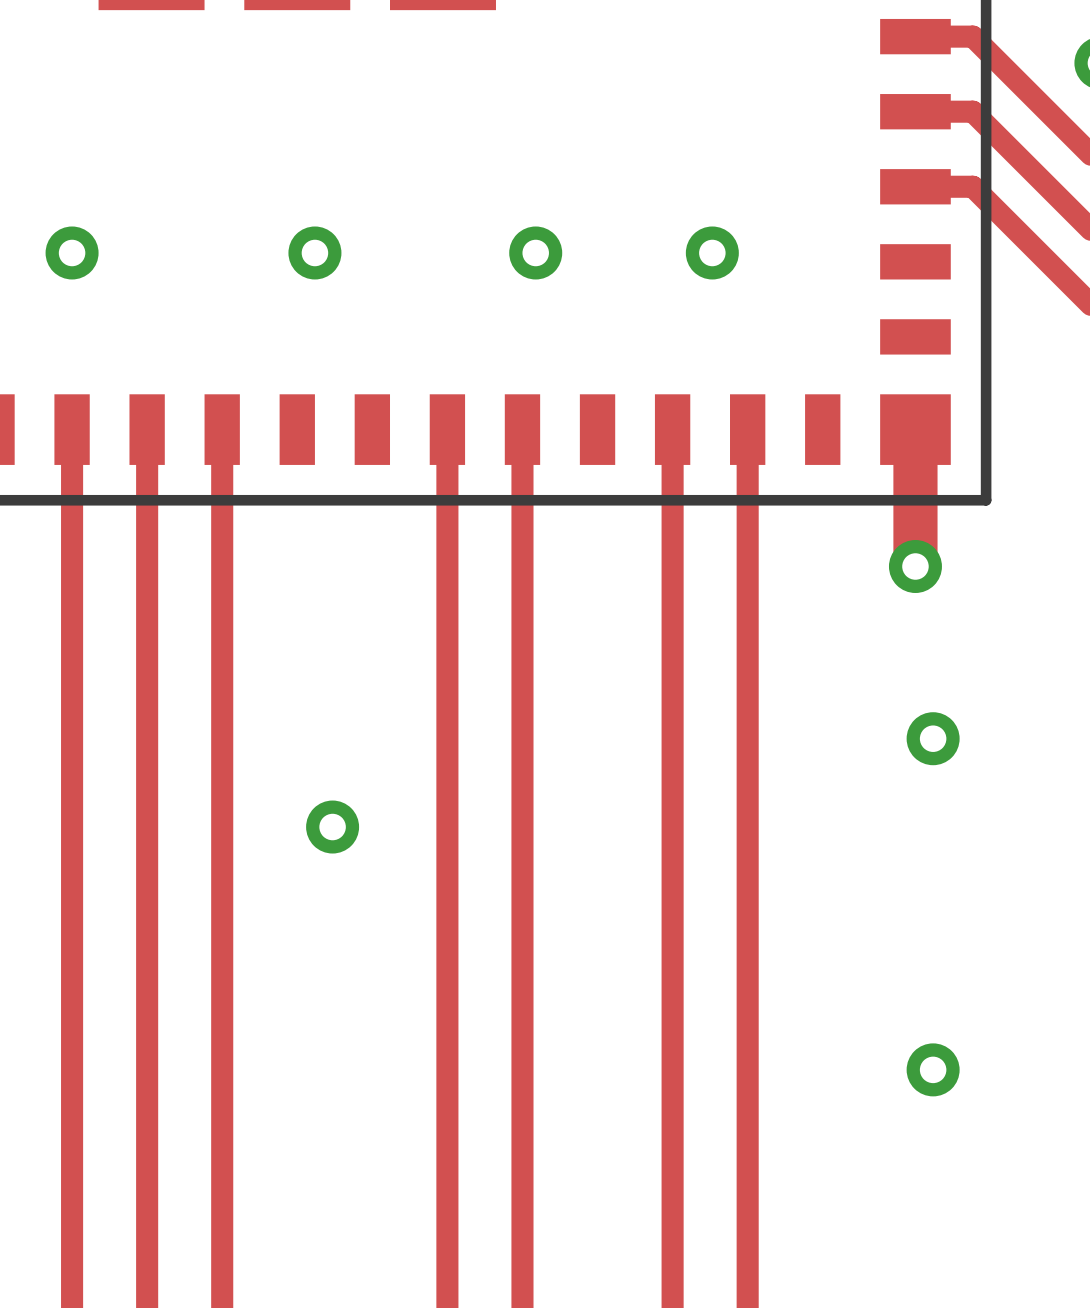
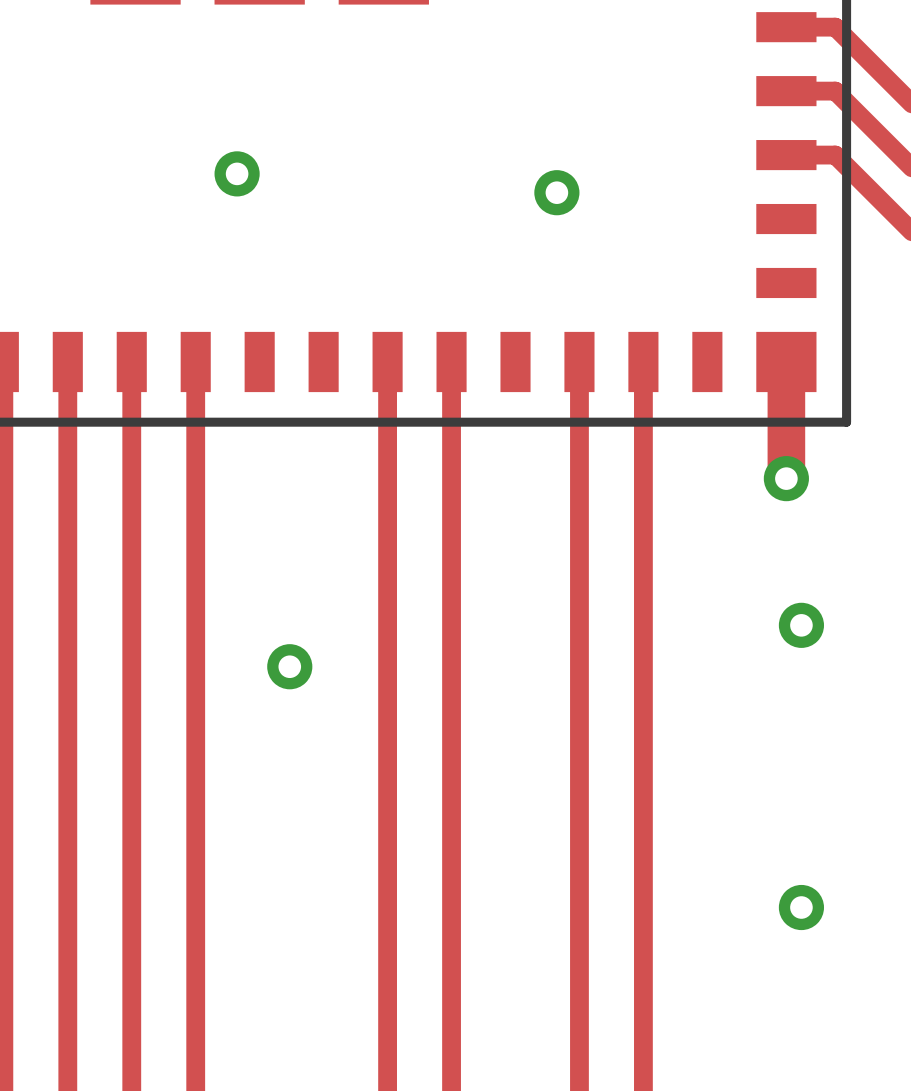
via: none -> (556, 192)
via: (72, 252) -> none
via position: (314, 252) -> (237, 173)
via: (535, 252) -> none
via: (712, 252) -> none
via position: (332, 827) -> (289, 666)

